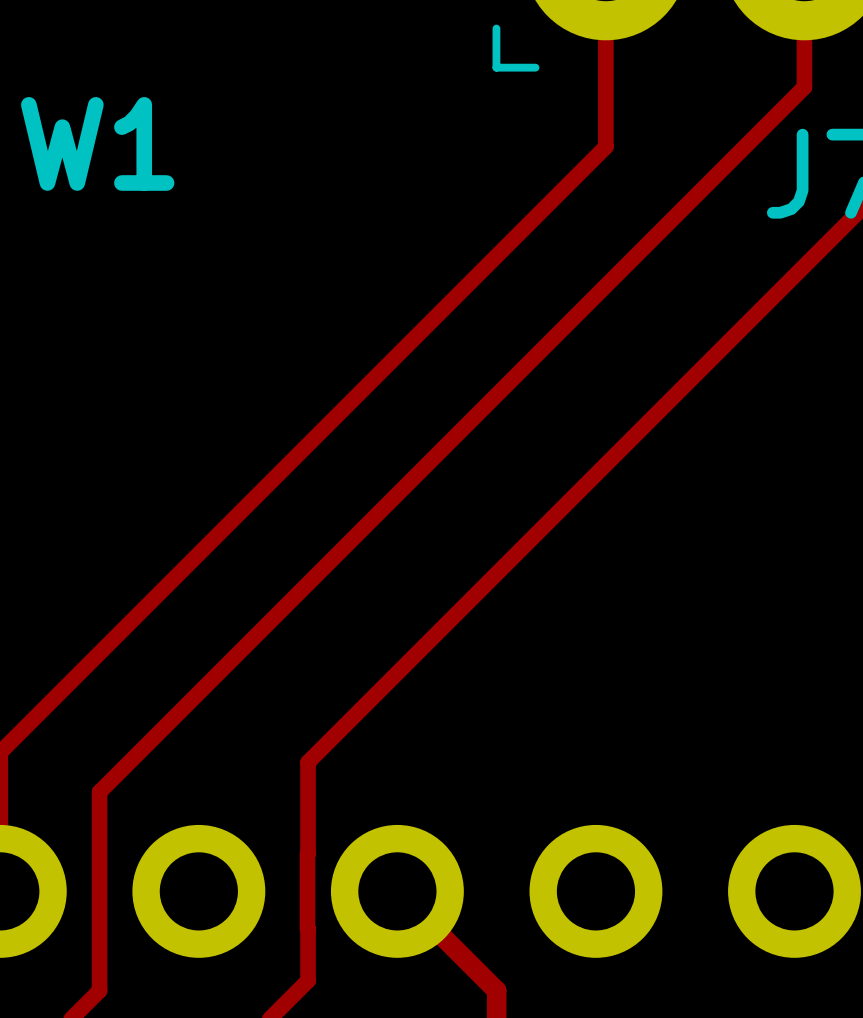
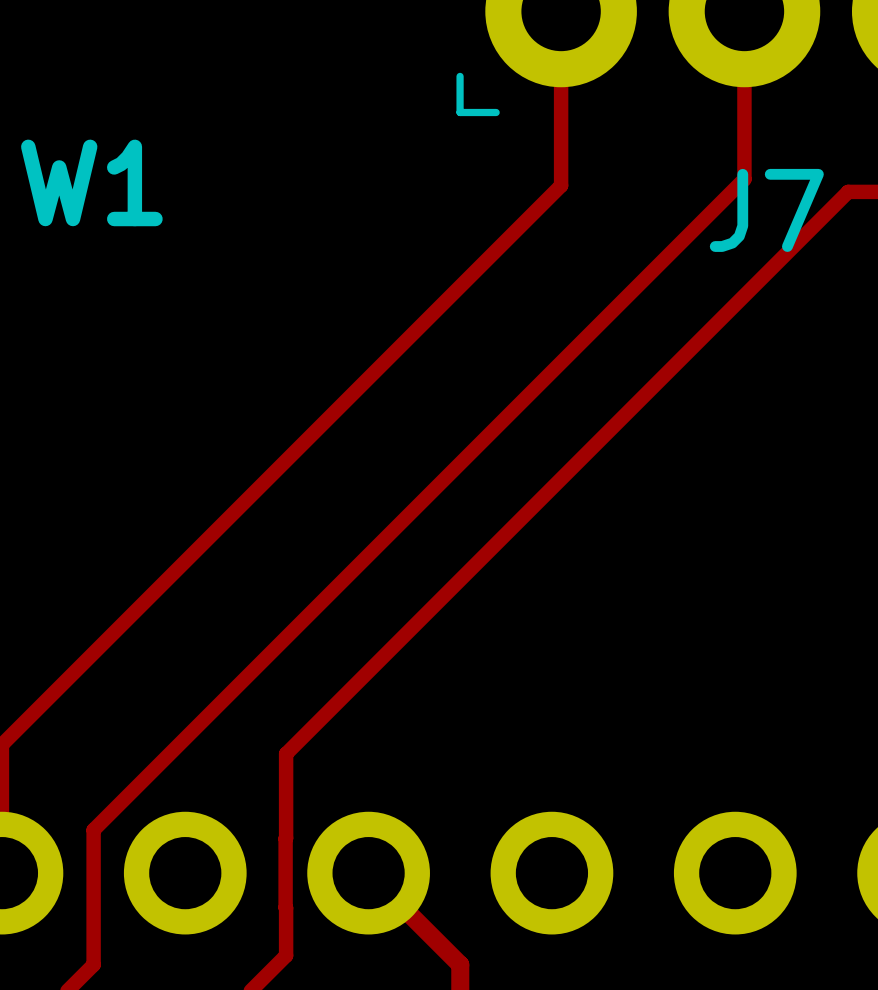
track: (804, 87) (99, 792) (99, 844) -> (744, 130) (744, 179) (93, 830)

